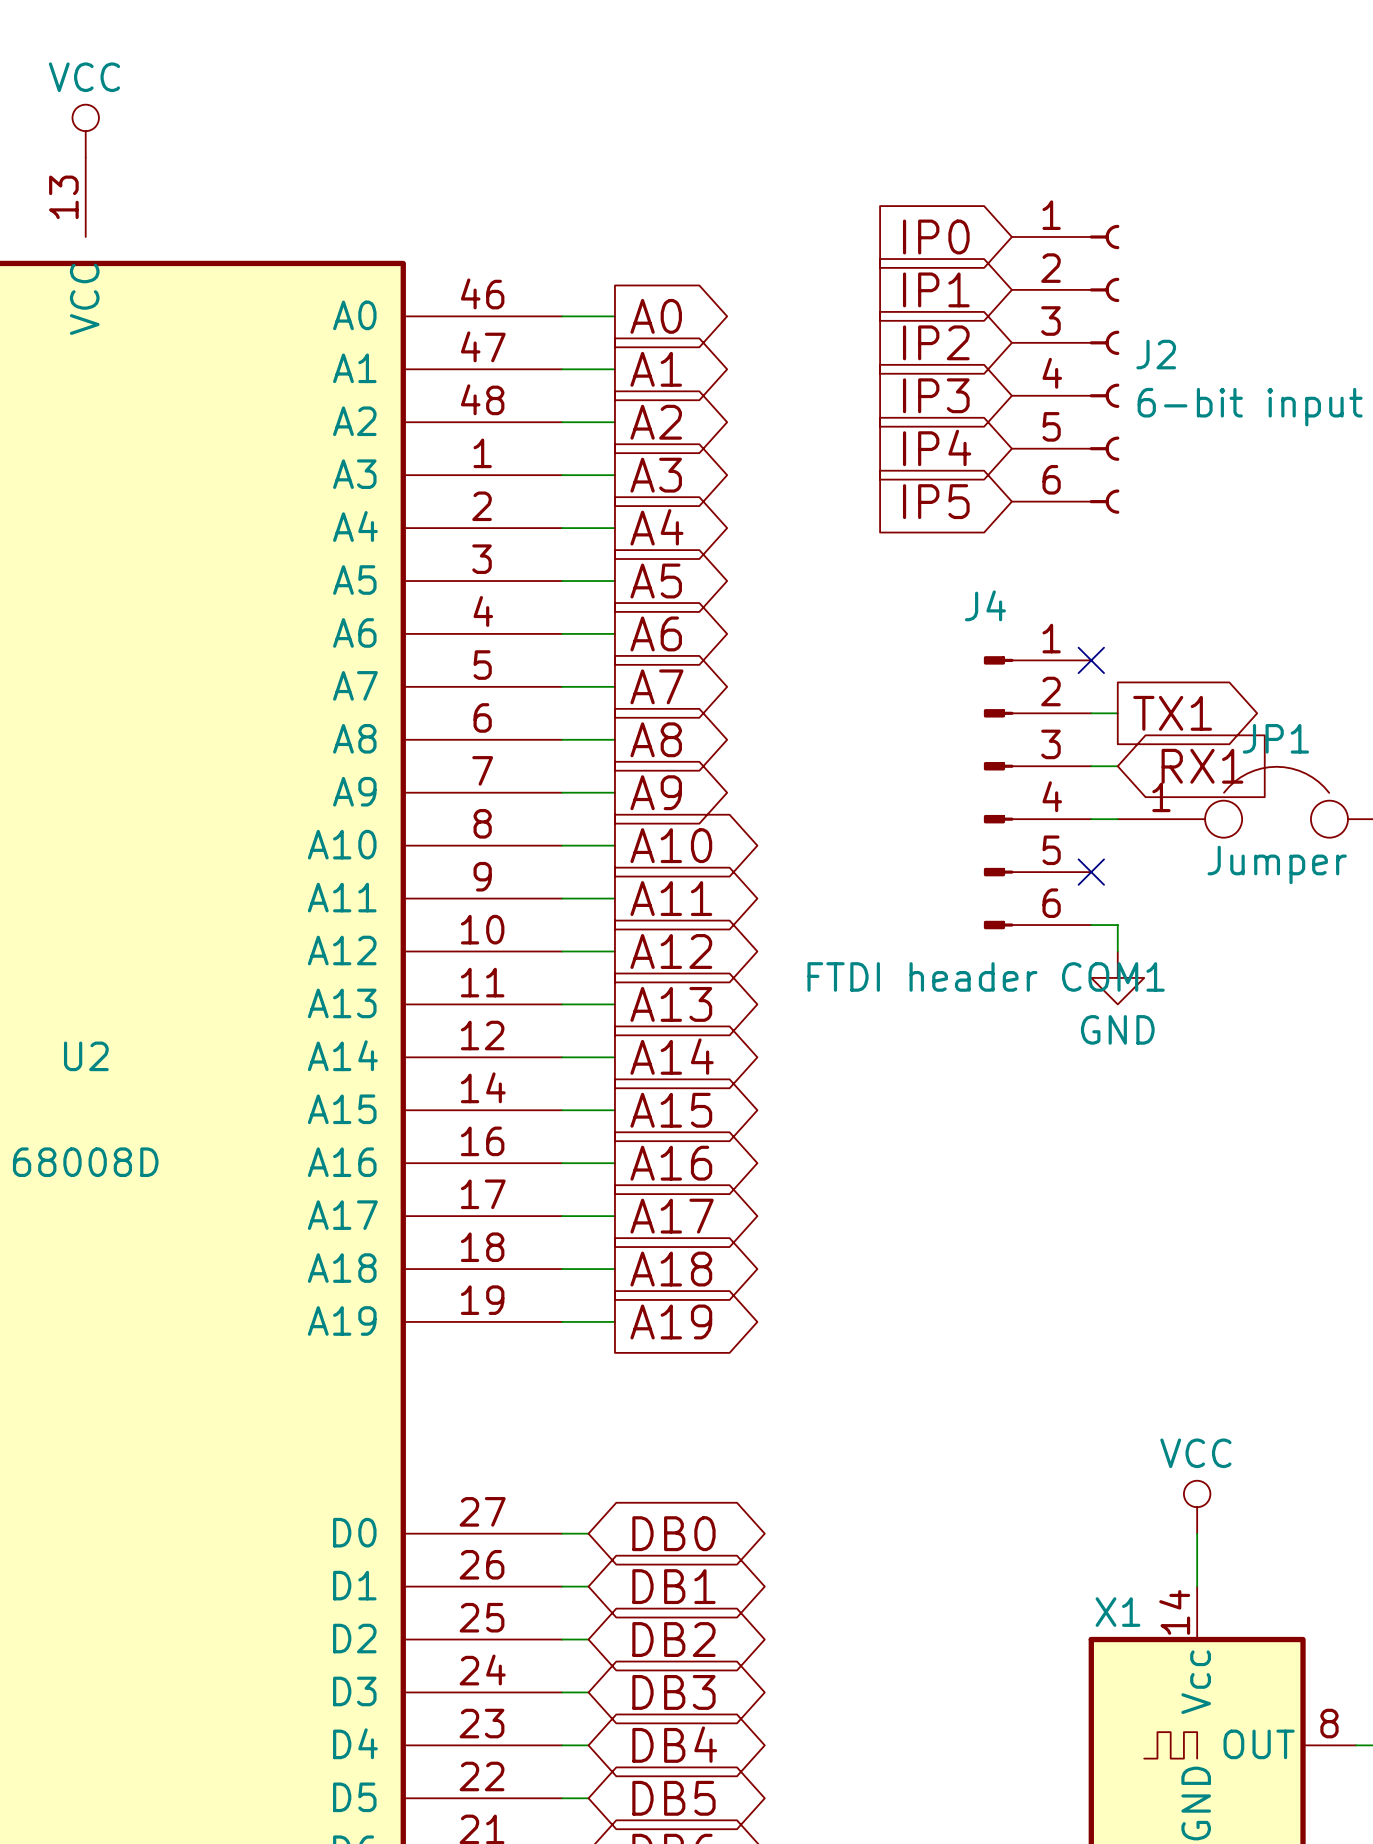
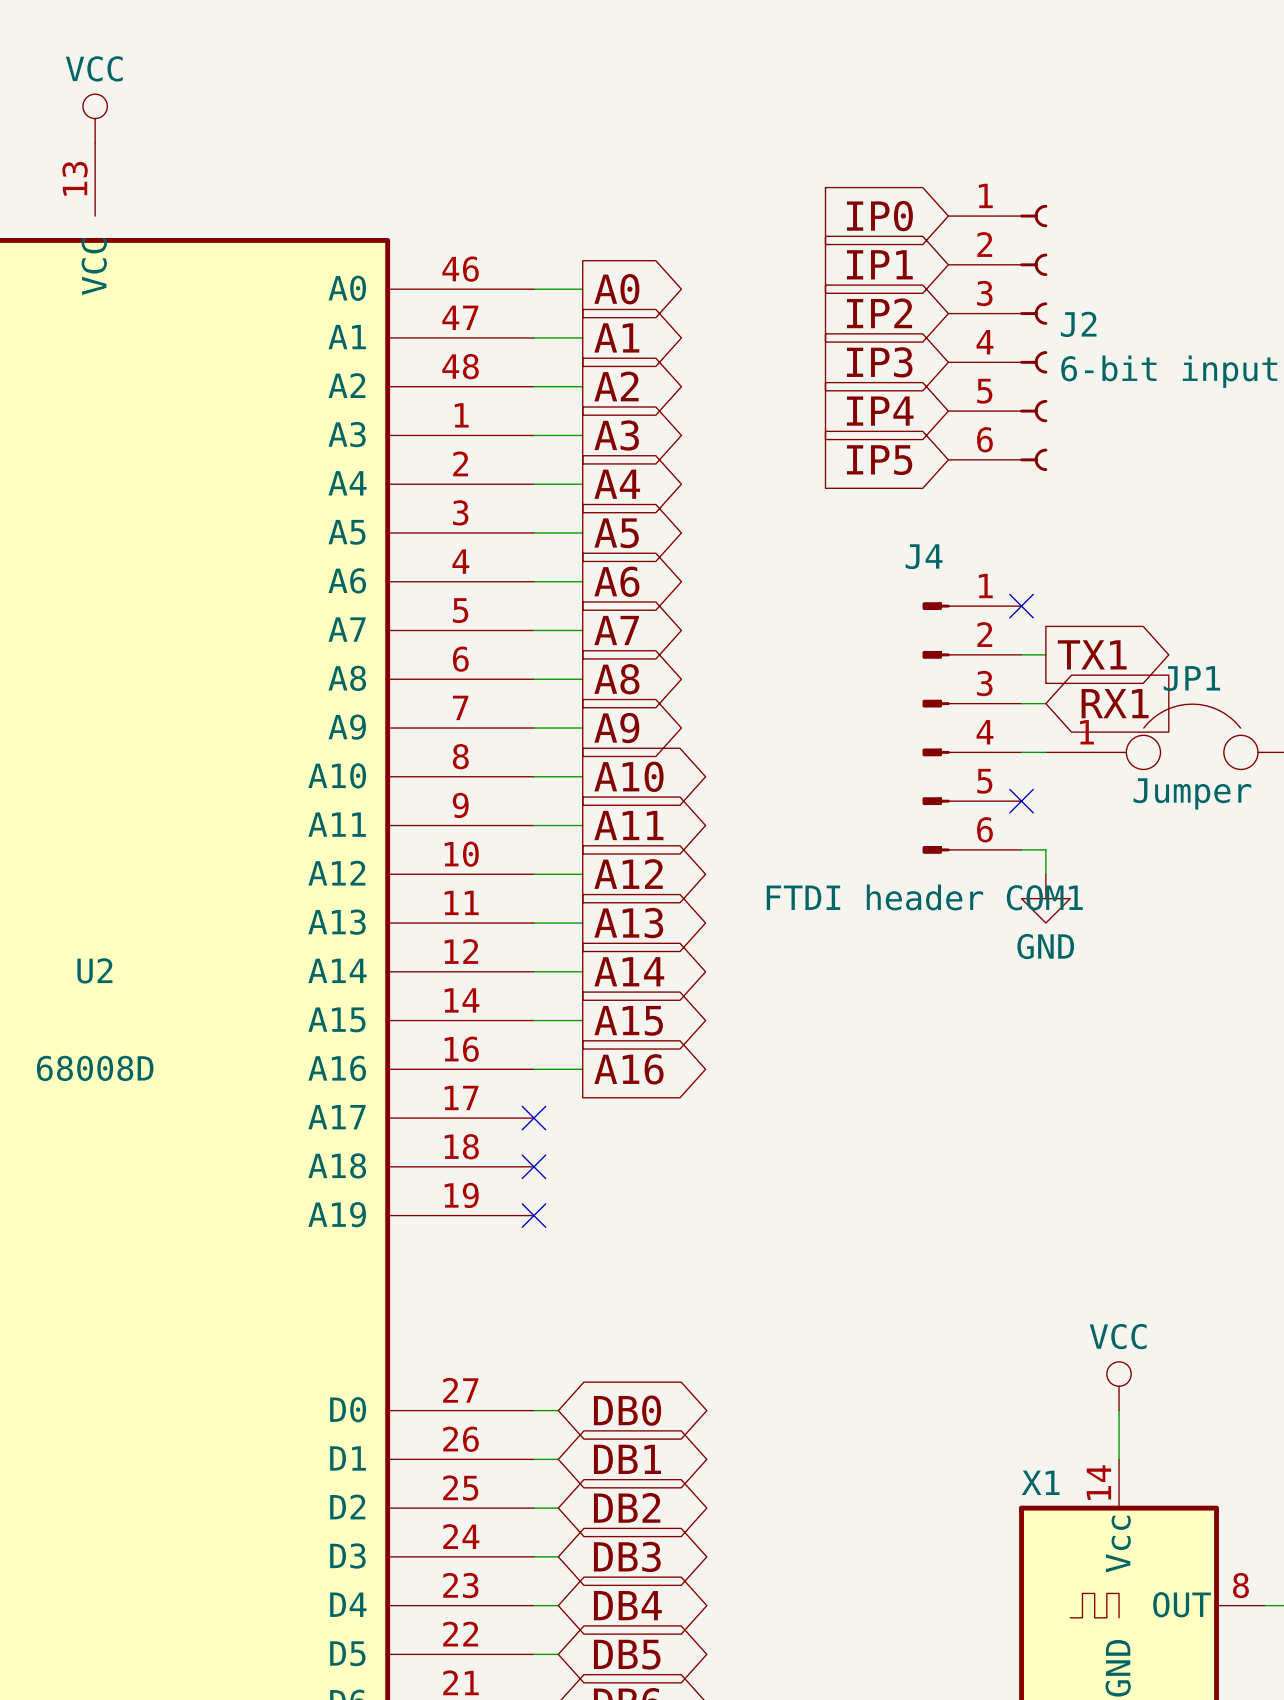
wire: (562, 1216) (614, 1216) -> none
no-connect mark: none -> (533, 1118)
global label: A17 (672, 1216) -> none
wire: (562, 1269) (614, 1269) -> none
no-connect mark: none -> (533, 1166)
global label: A18 (671, 1269) -> none
wire: (562, 1321) (614, 1321) -> none
no-connect mark: none -> (533, 1215)
global label: A19 (671, 1321) -> none

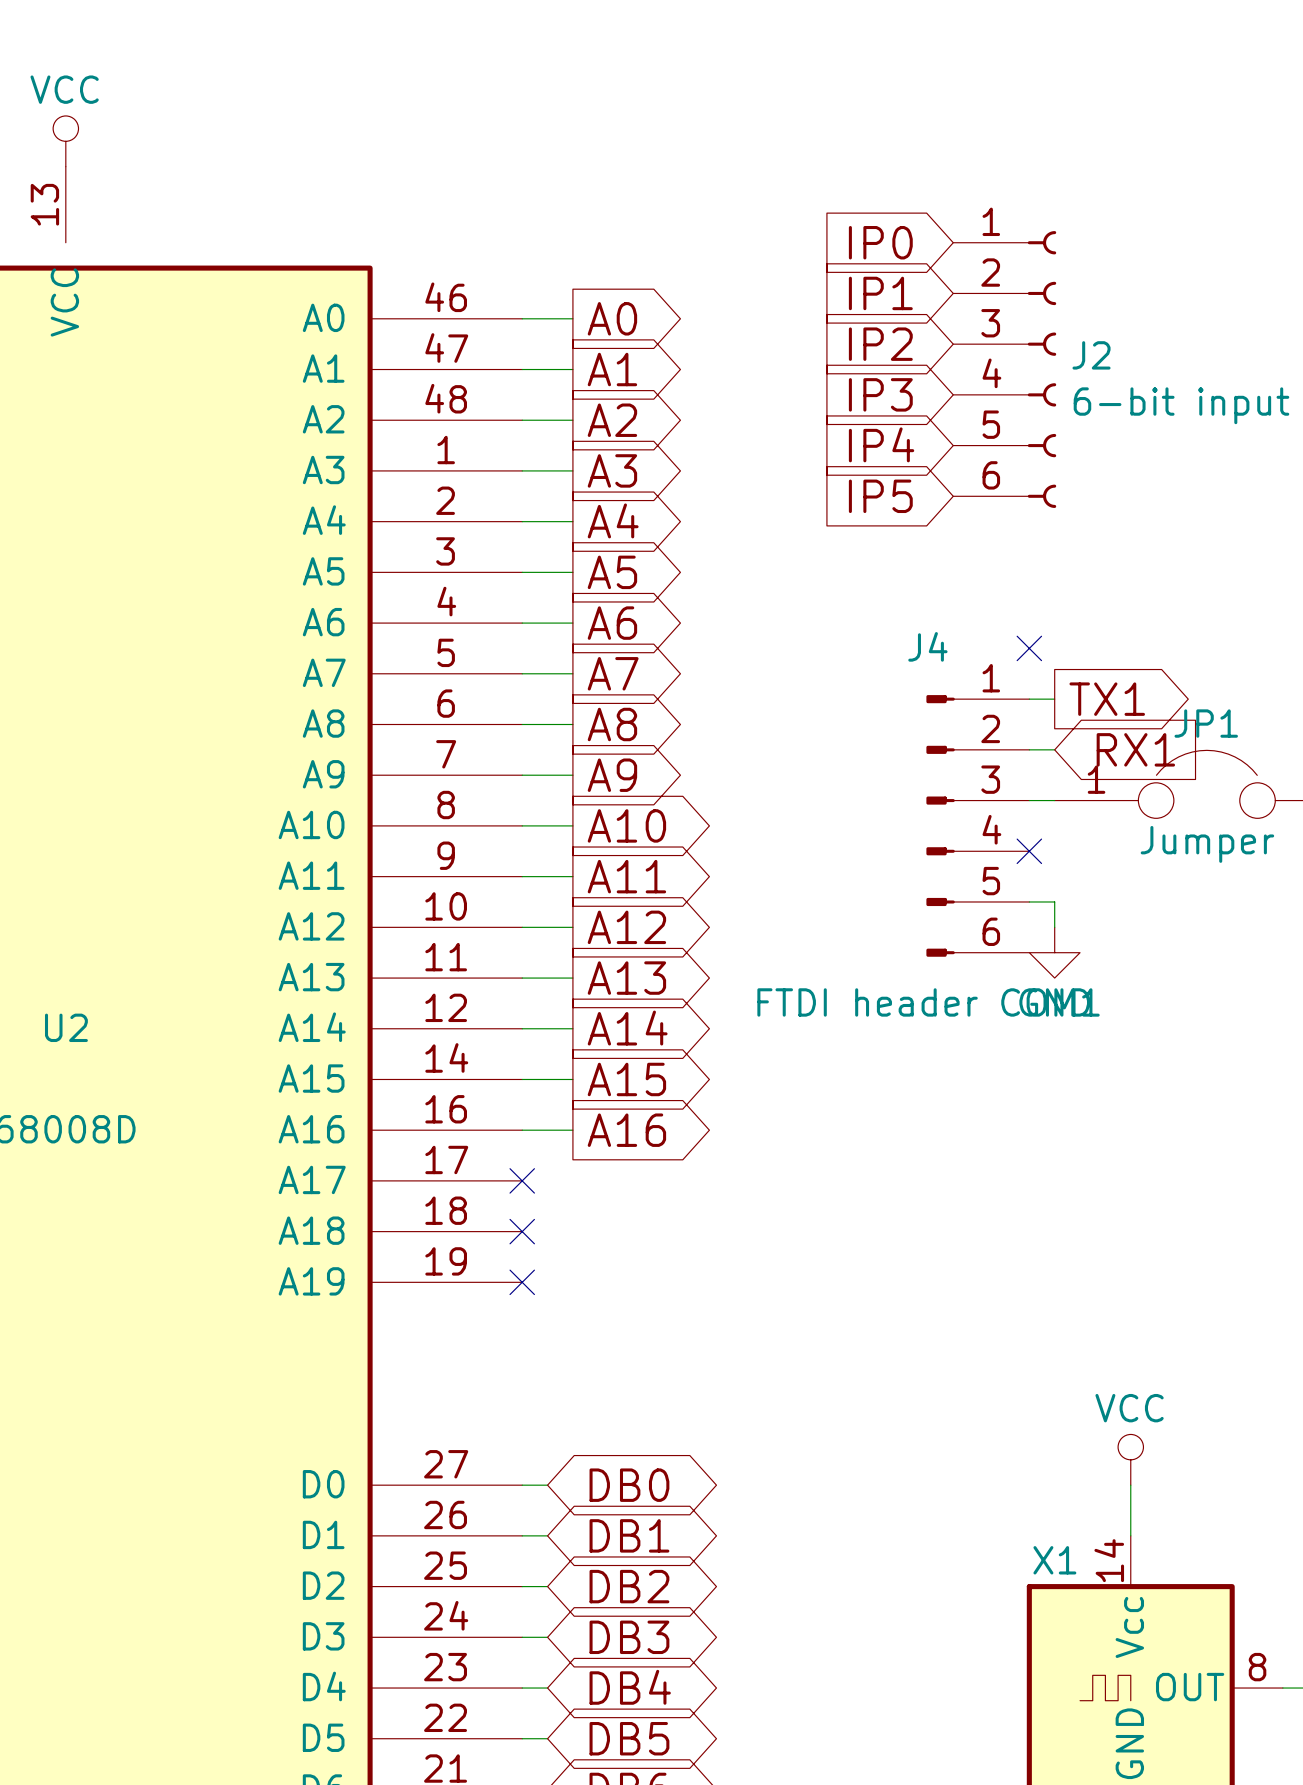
J4 position: (972, 728) -> (977, 825)

